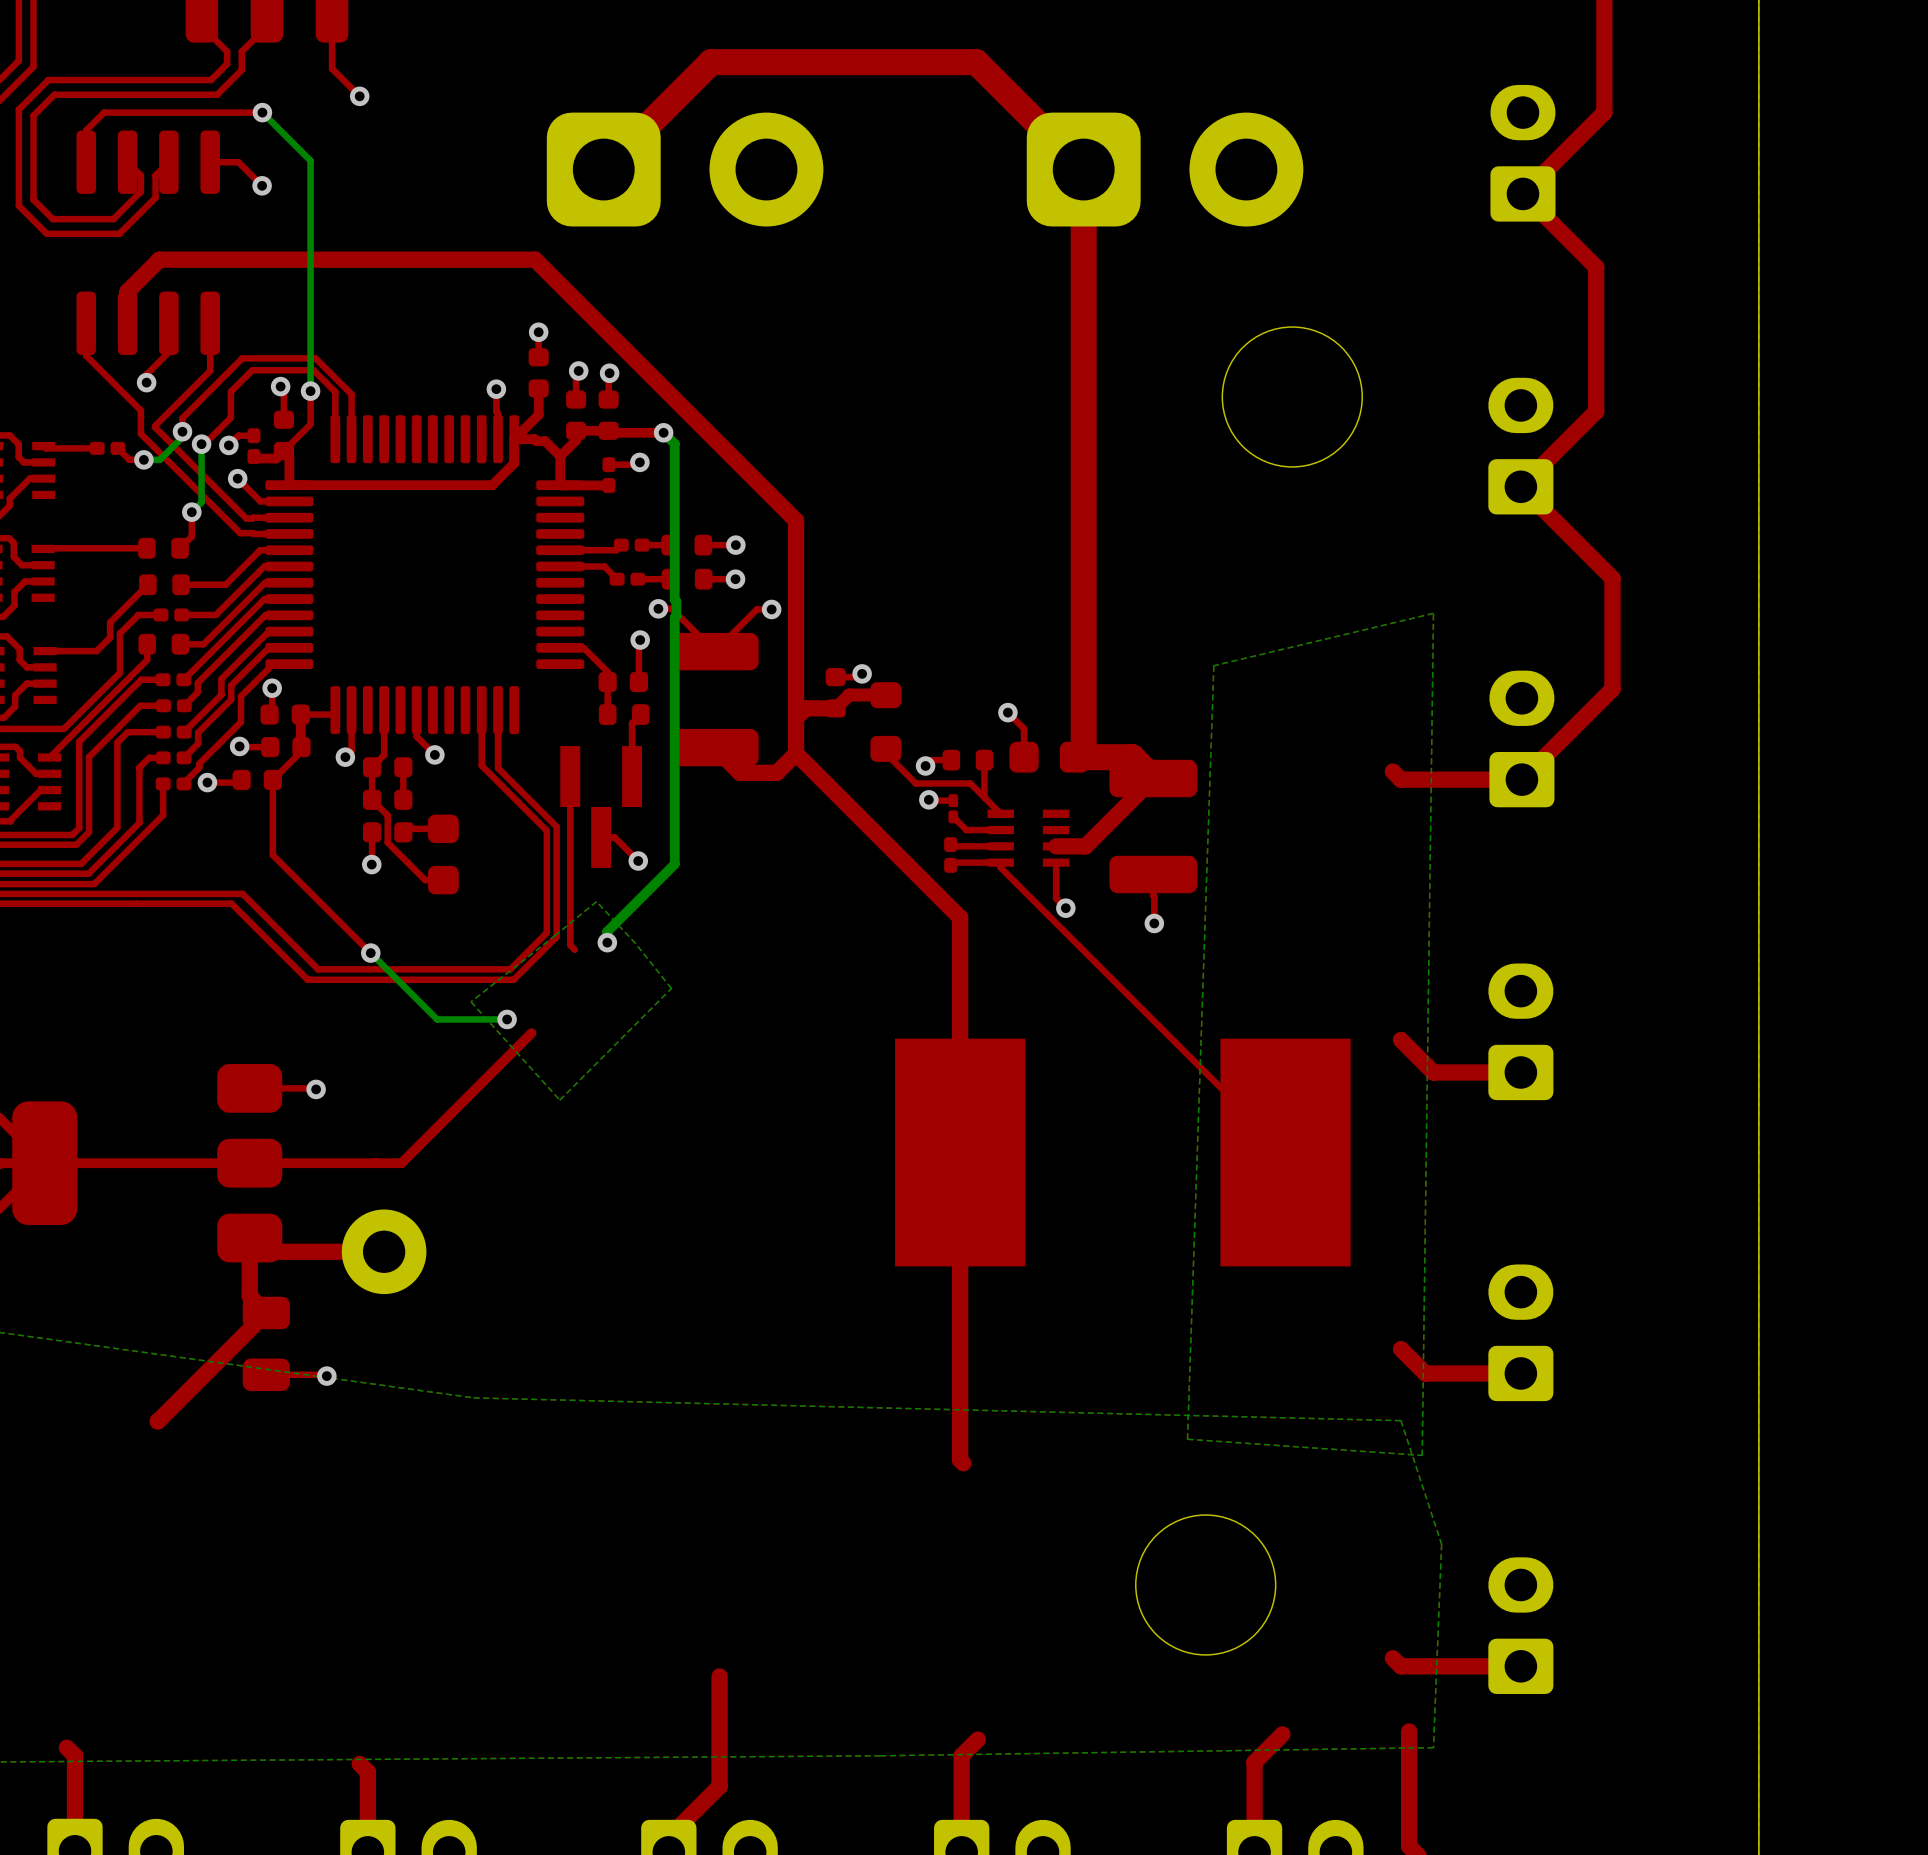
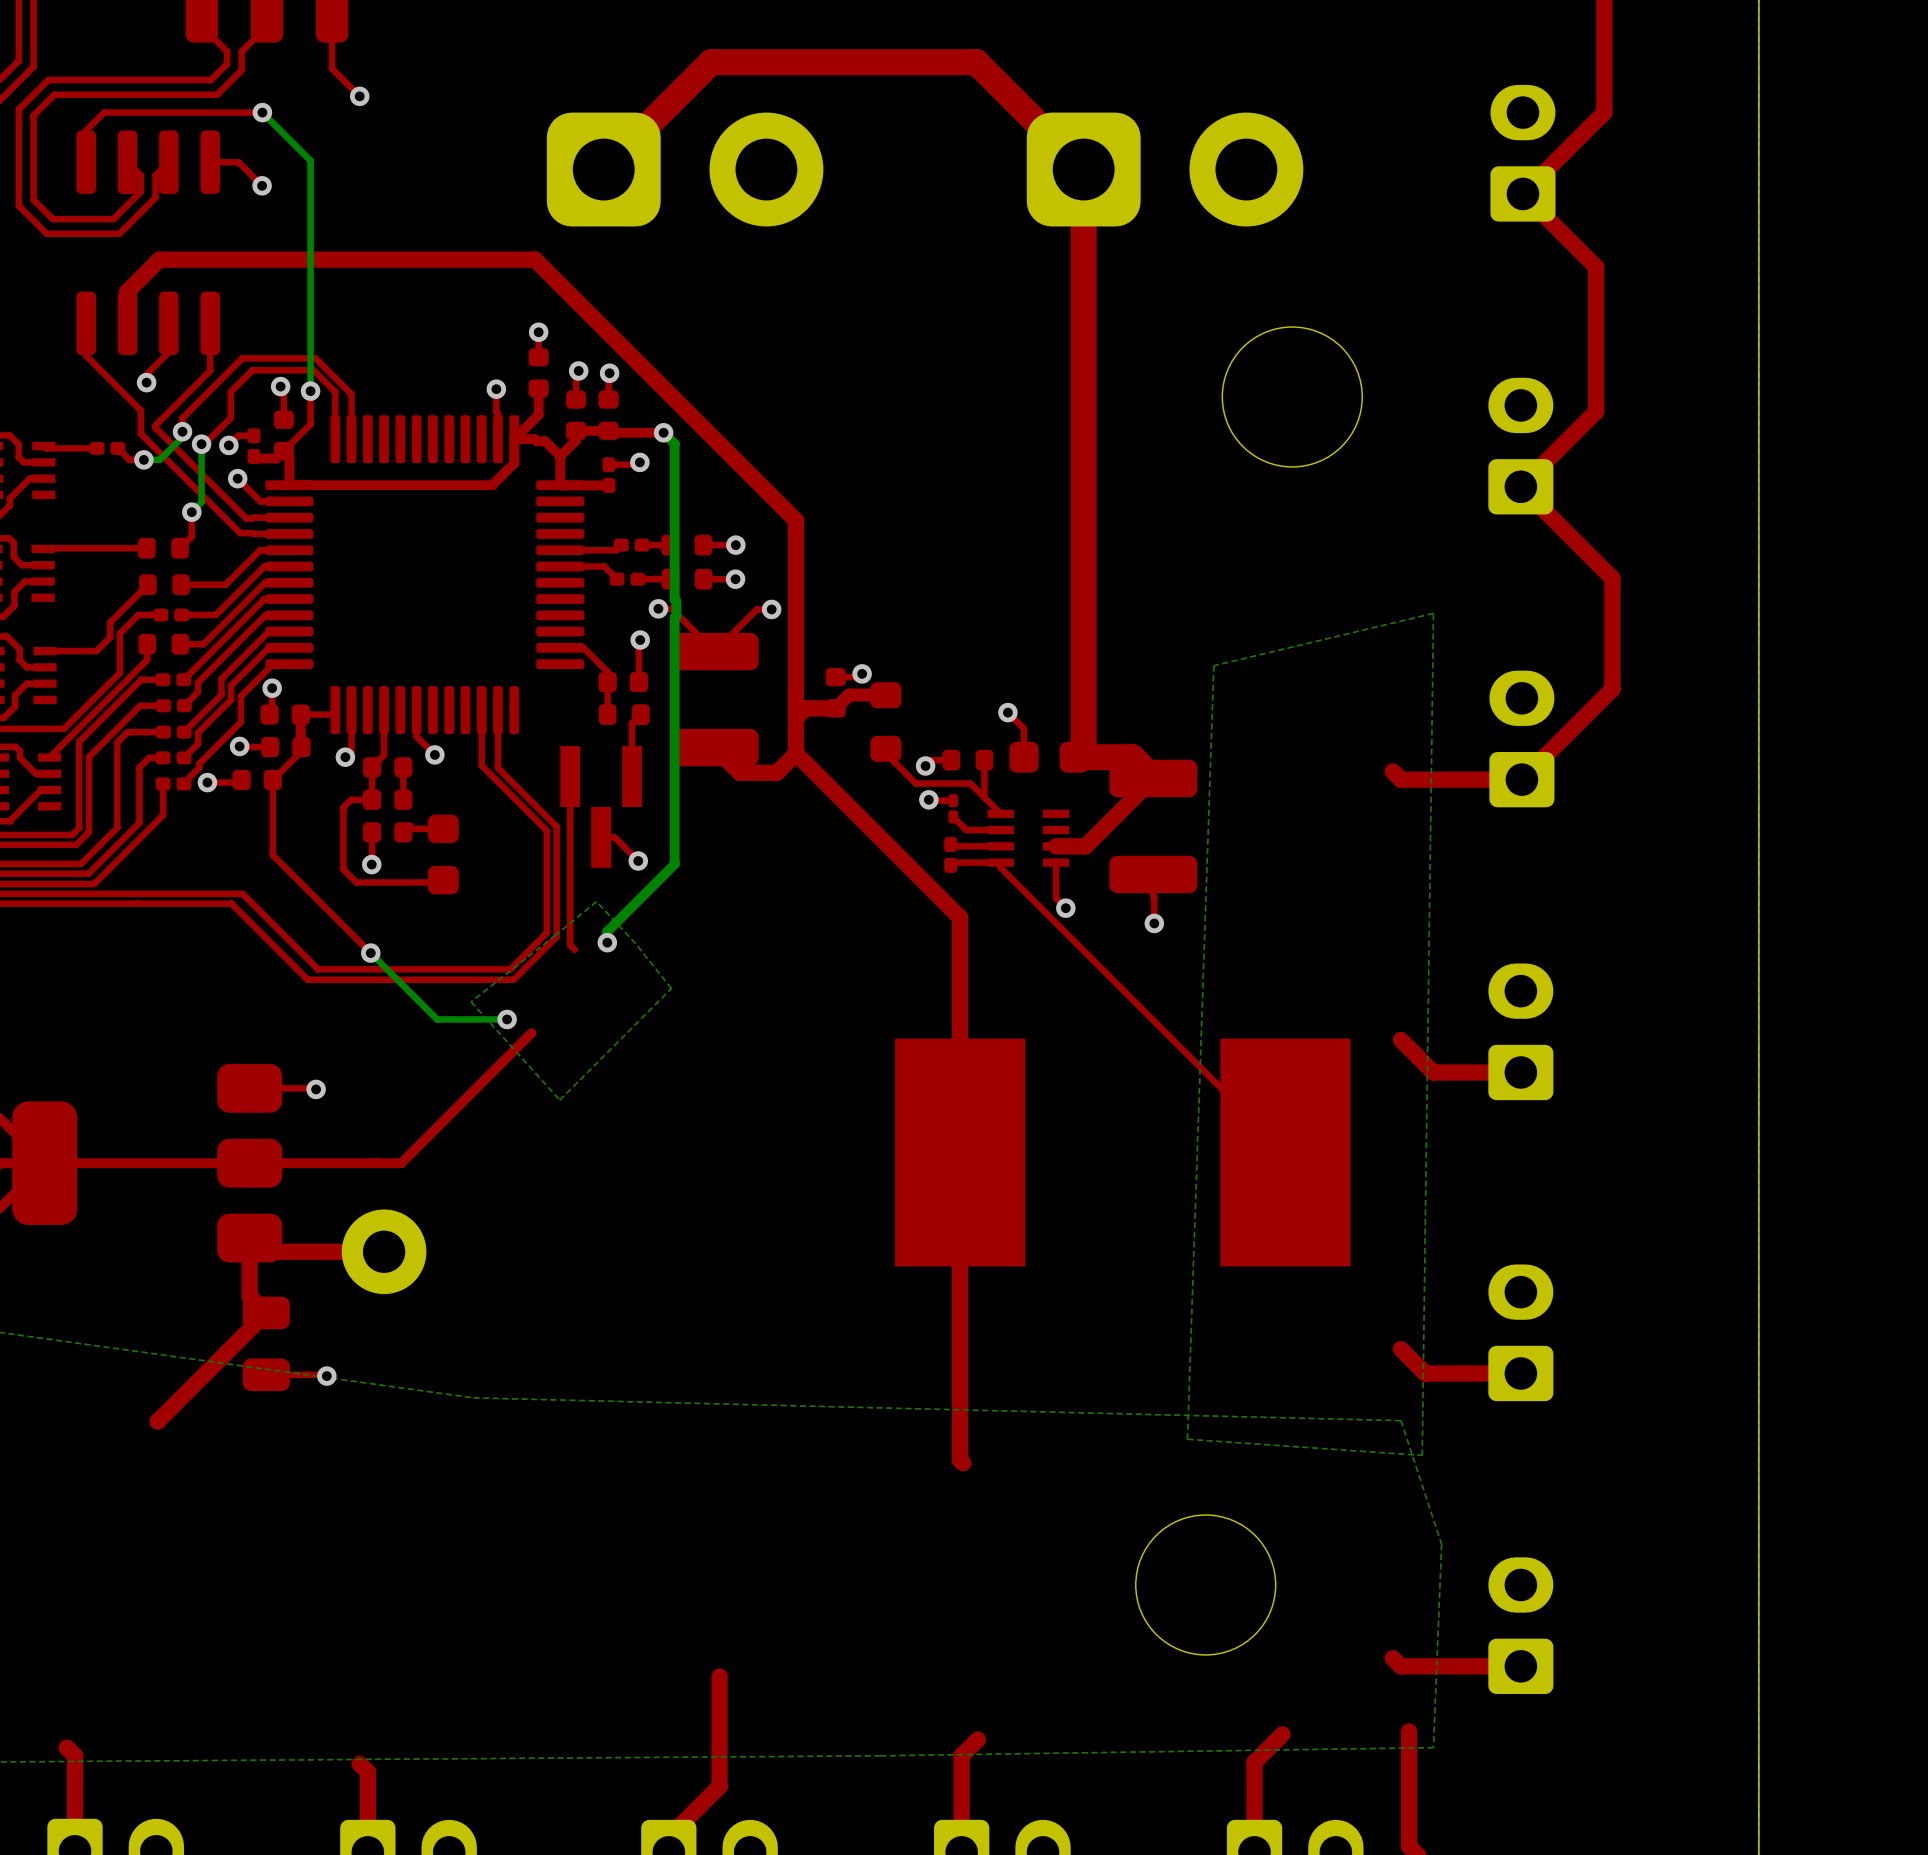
top track: (372, 799) (387, 815) (387, 842) (425, 880) (443, 880) -> (372, 799) (351, 799) (343, 807) (343, 869) (356, 882) (440, 882) (443, 880)

